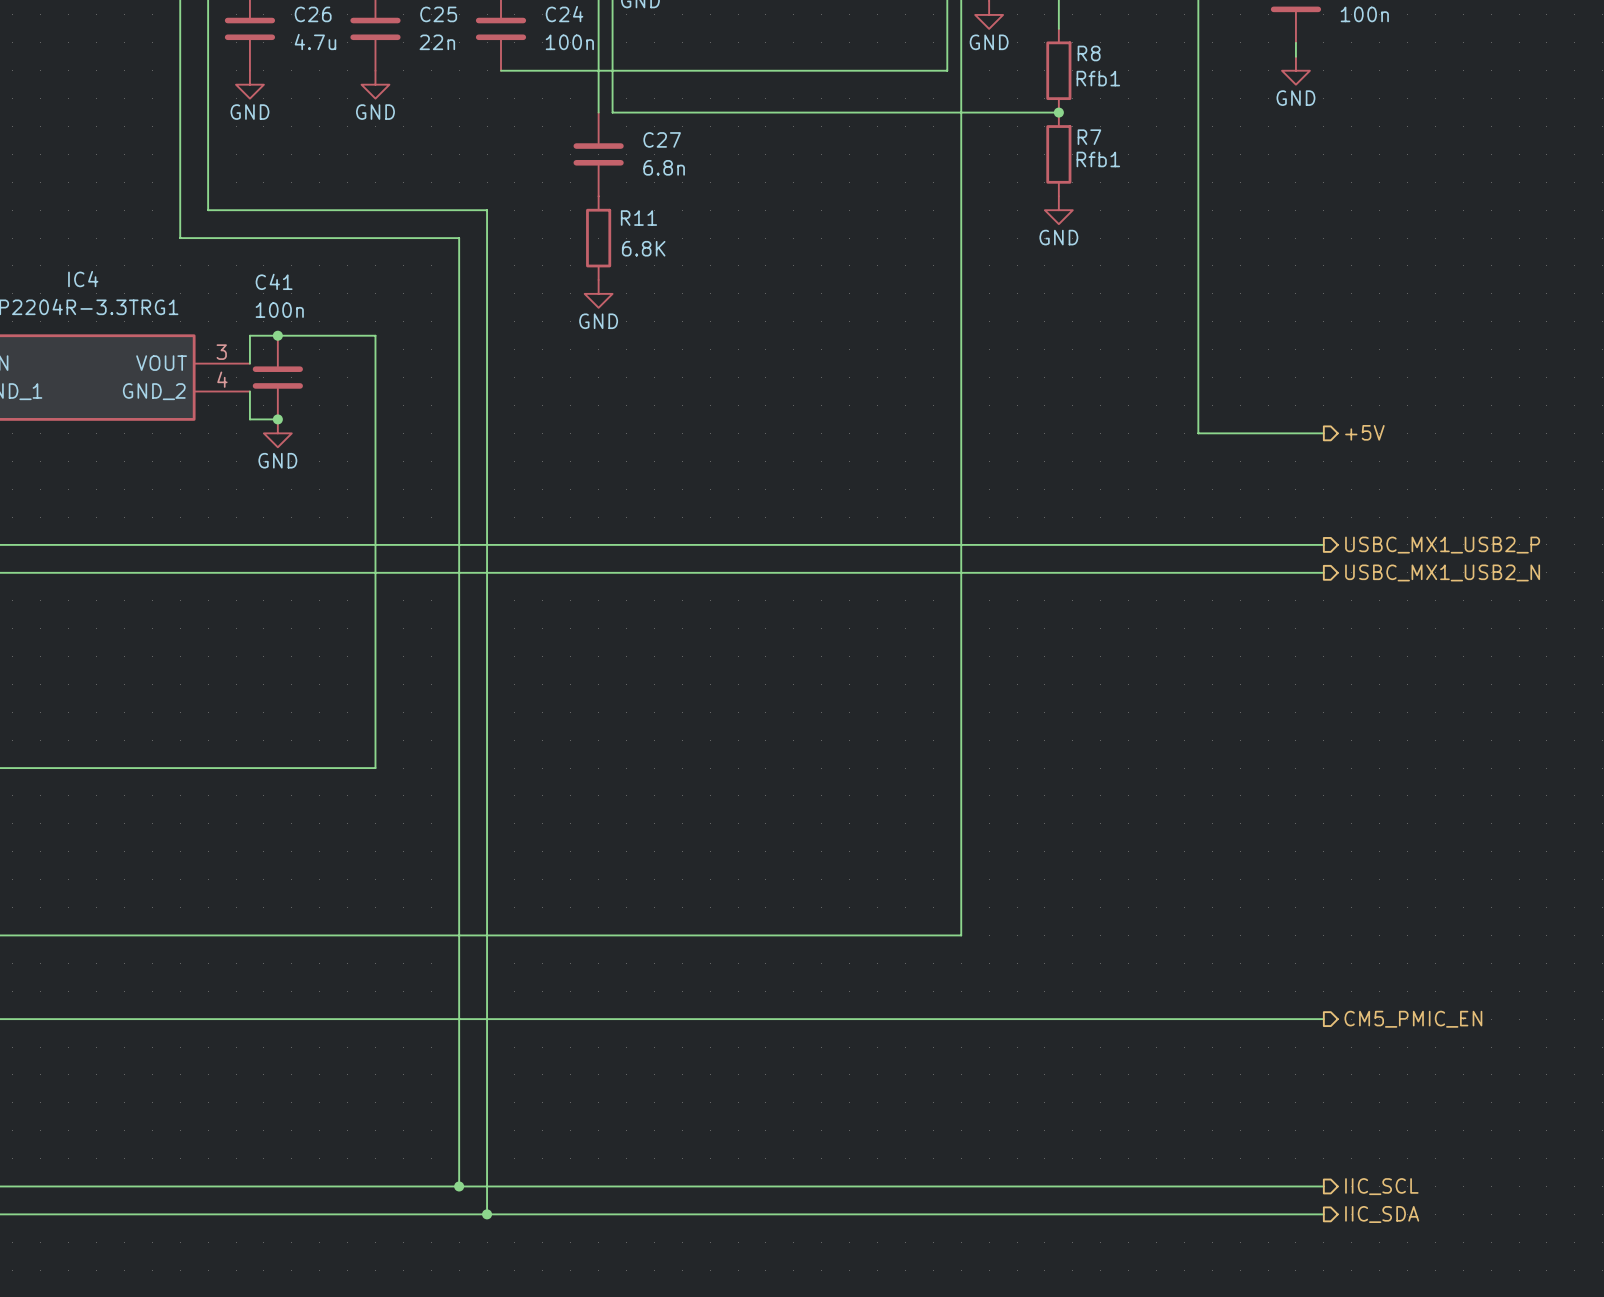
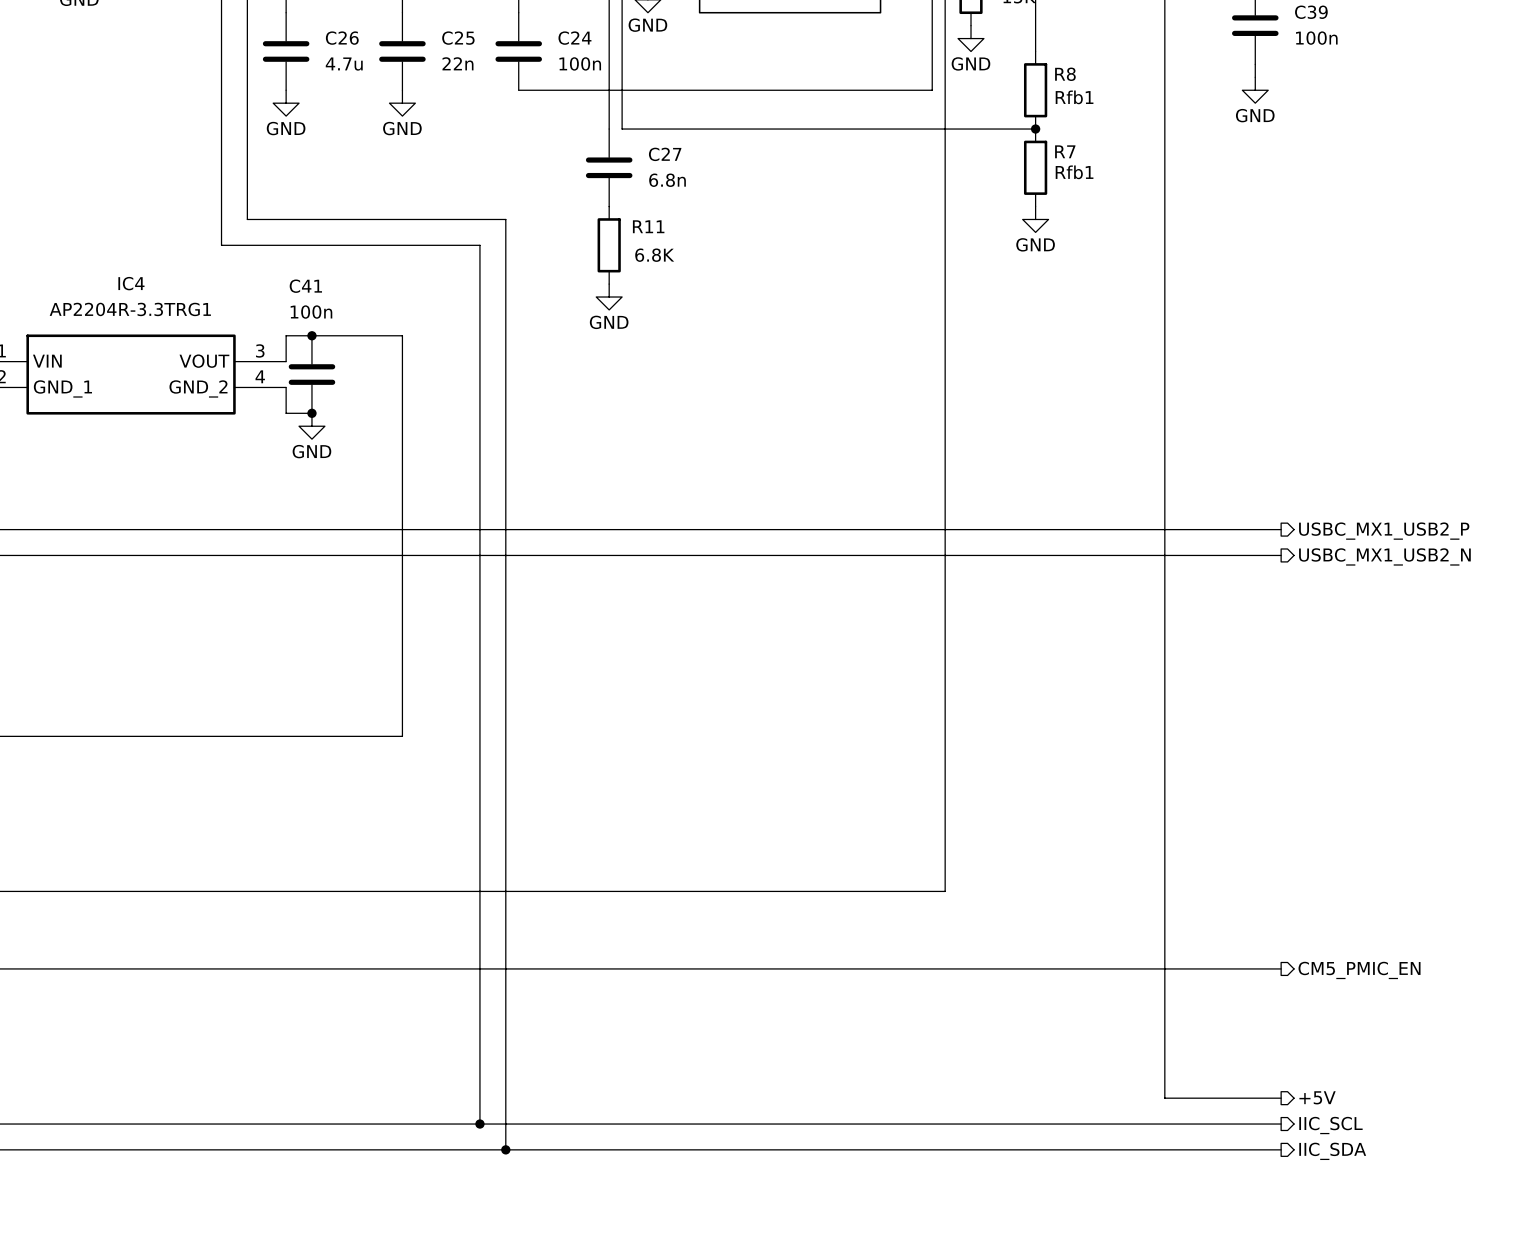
hierarchical label: +5V (1364, 432) -> none
wire: (1198, 433) (1323, 433) -> (1164, 426) (1164, 1098) (1281, 1098)
hierarchical label: none -> +5V (1317, 1097)

